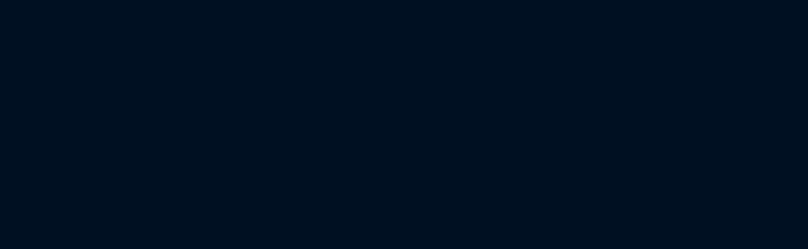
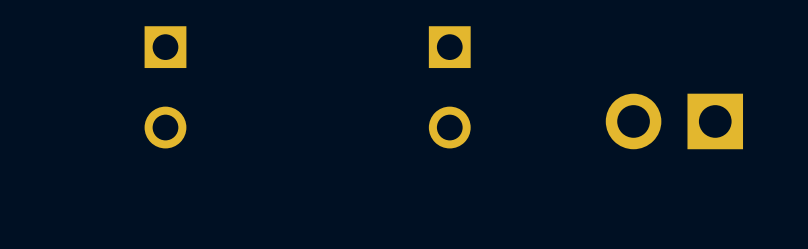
part: none -> (165, 87)
part: none -> (449, 87)
part: none -> (674, 121)

